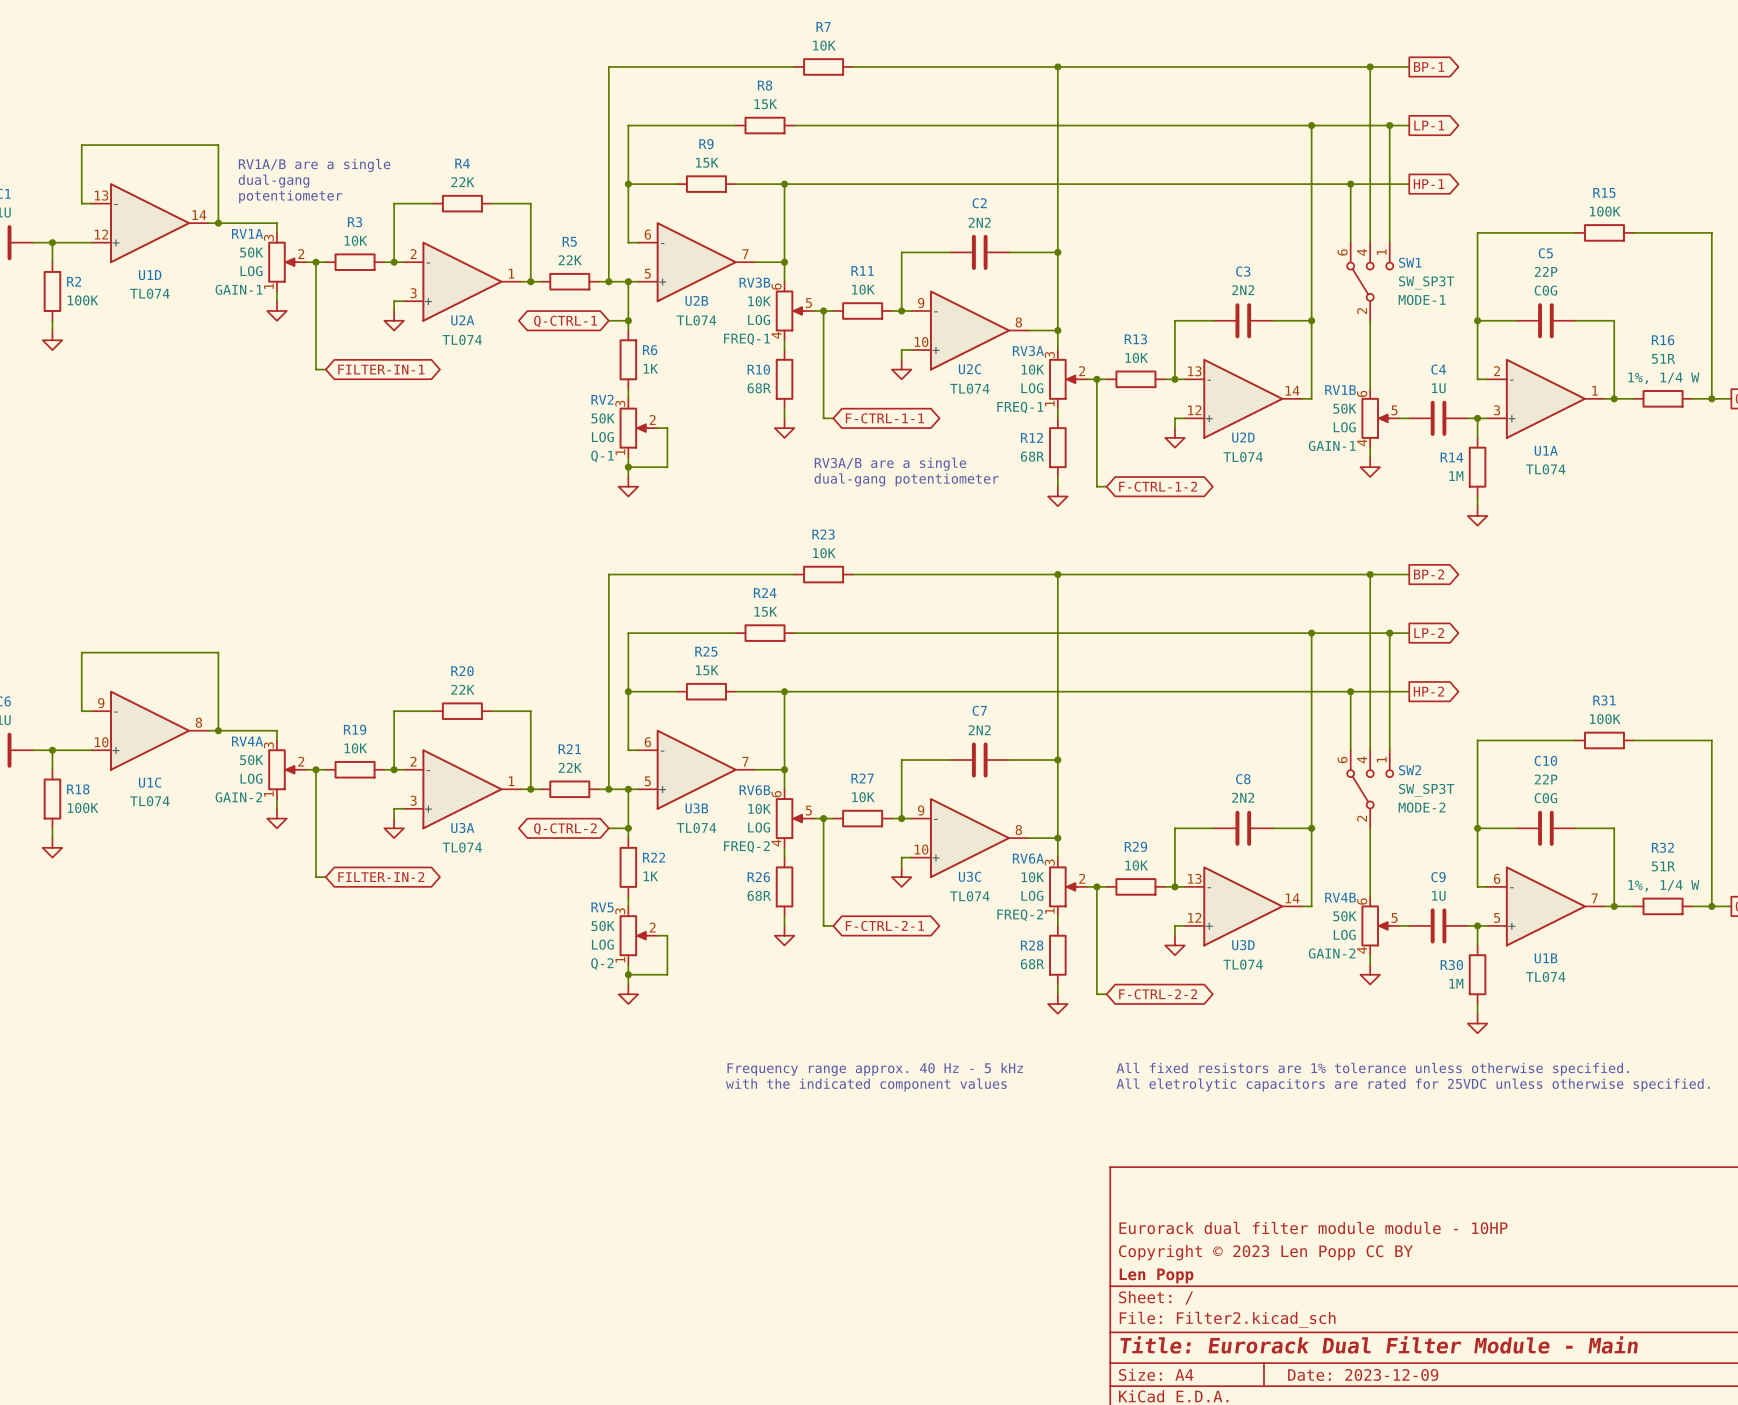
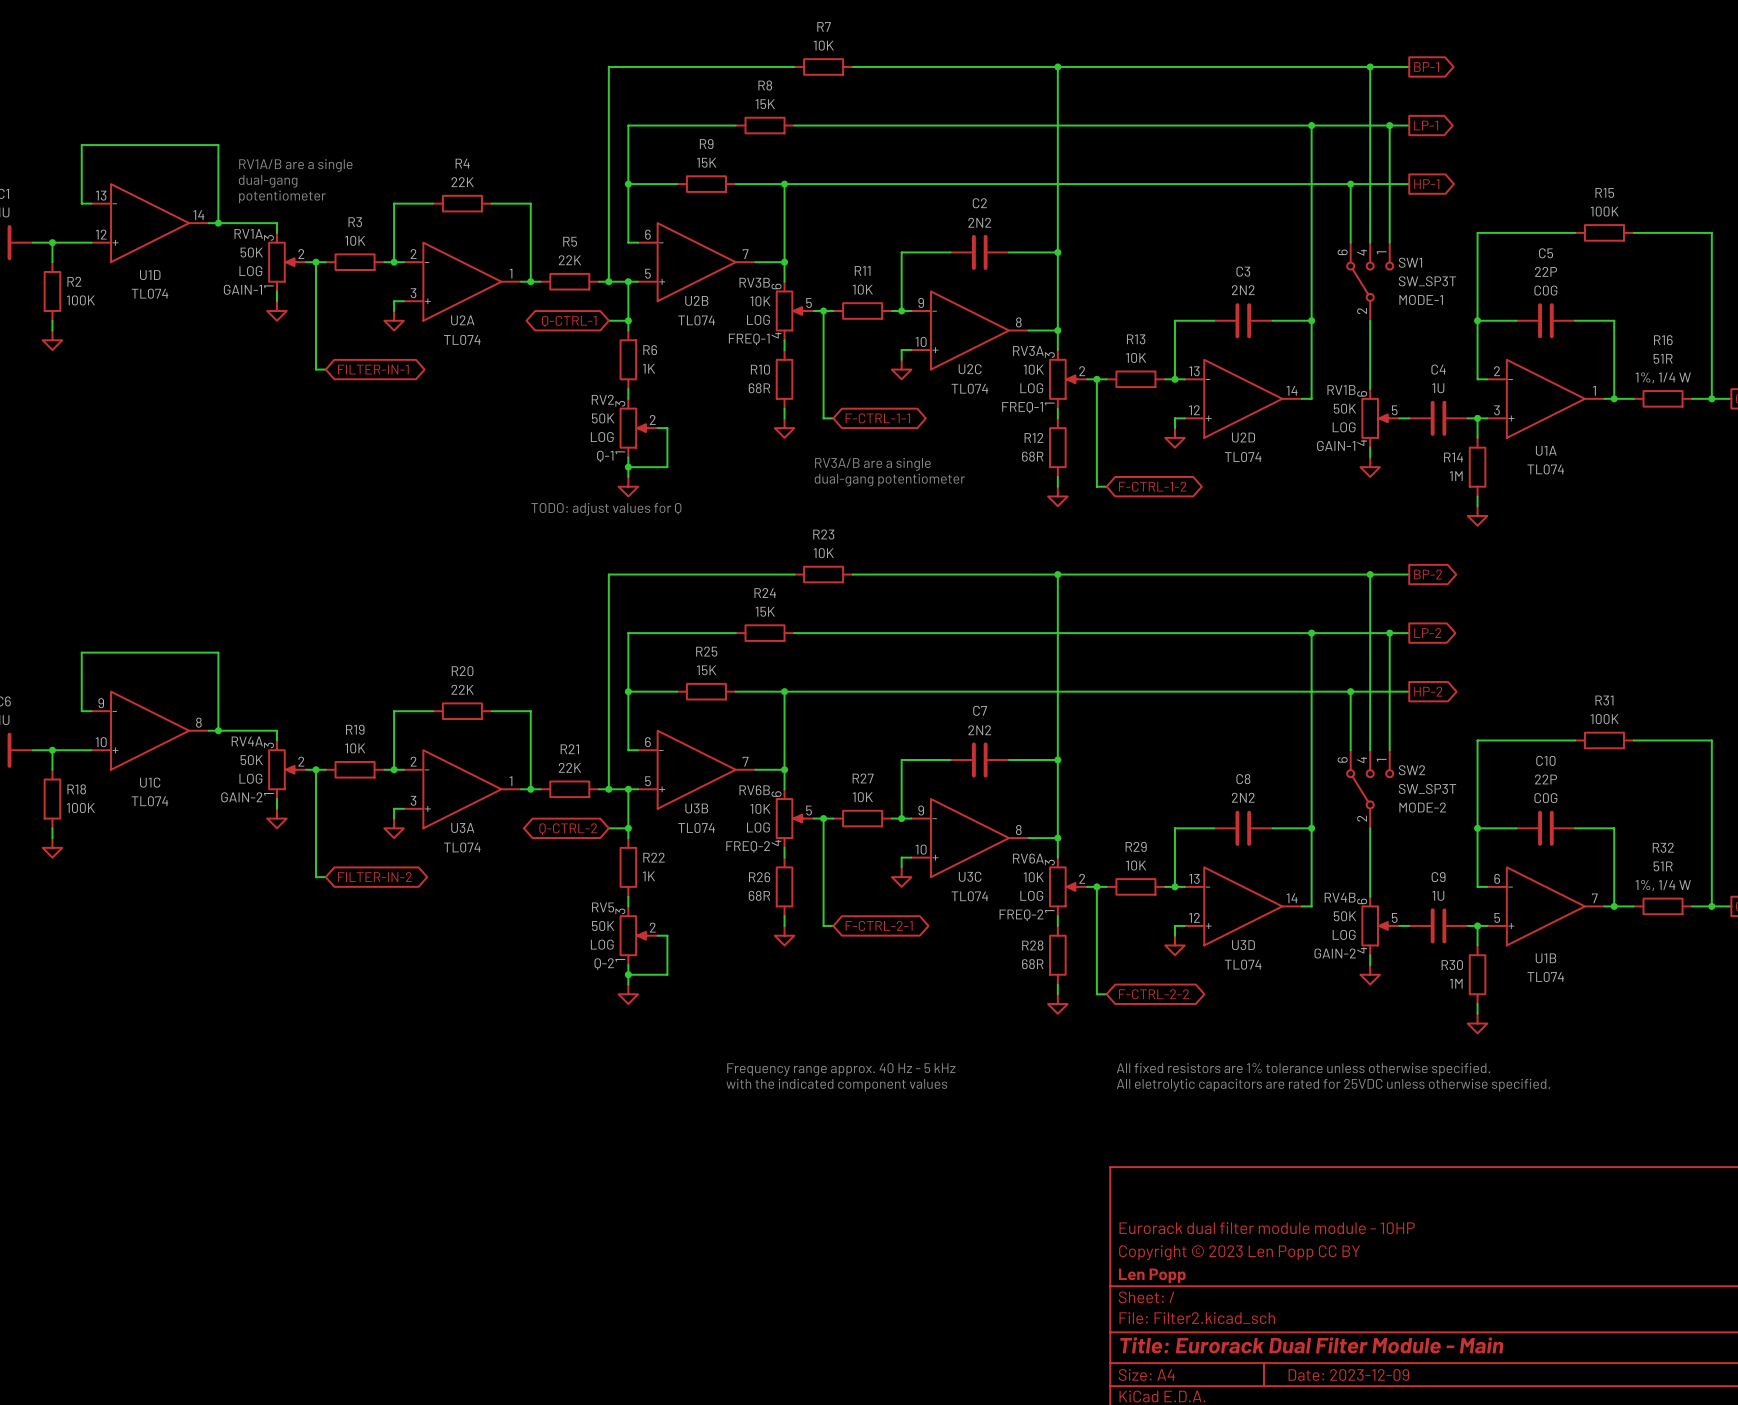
text: none -> TODO: adjust values for Q (606, 509)

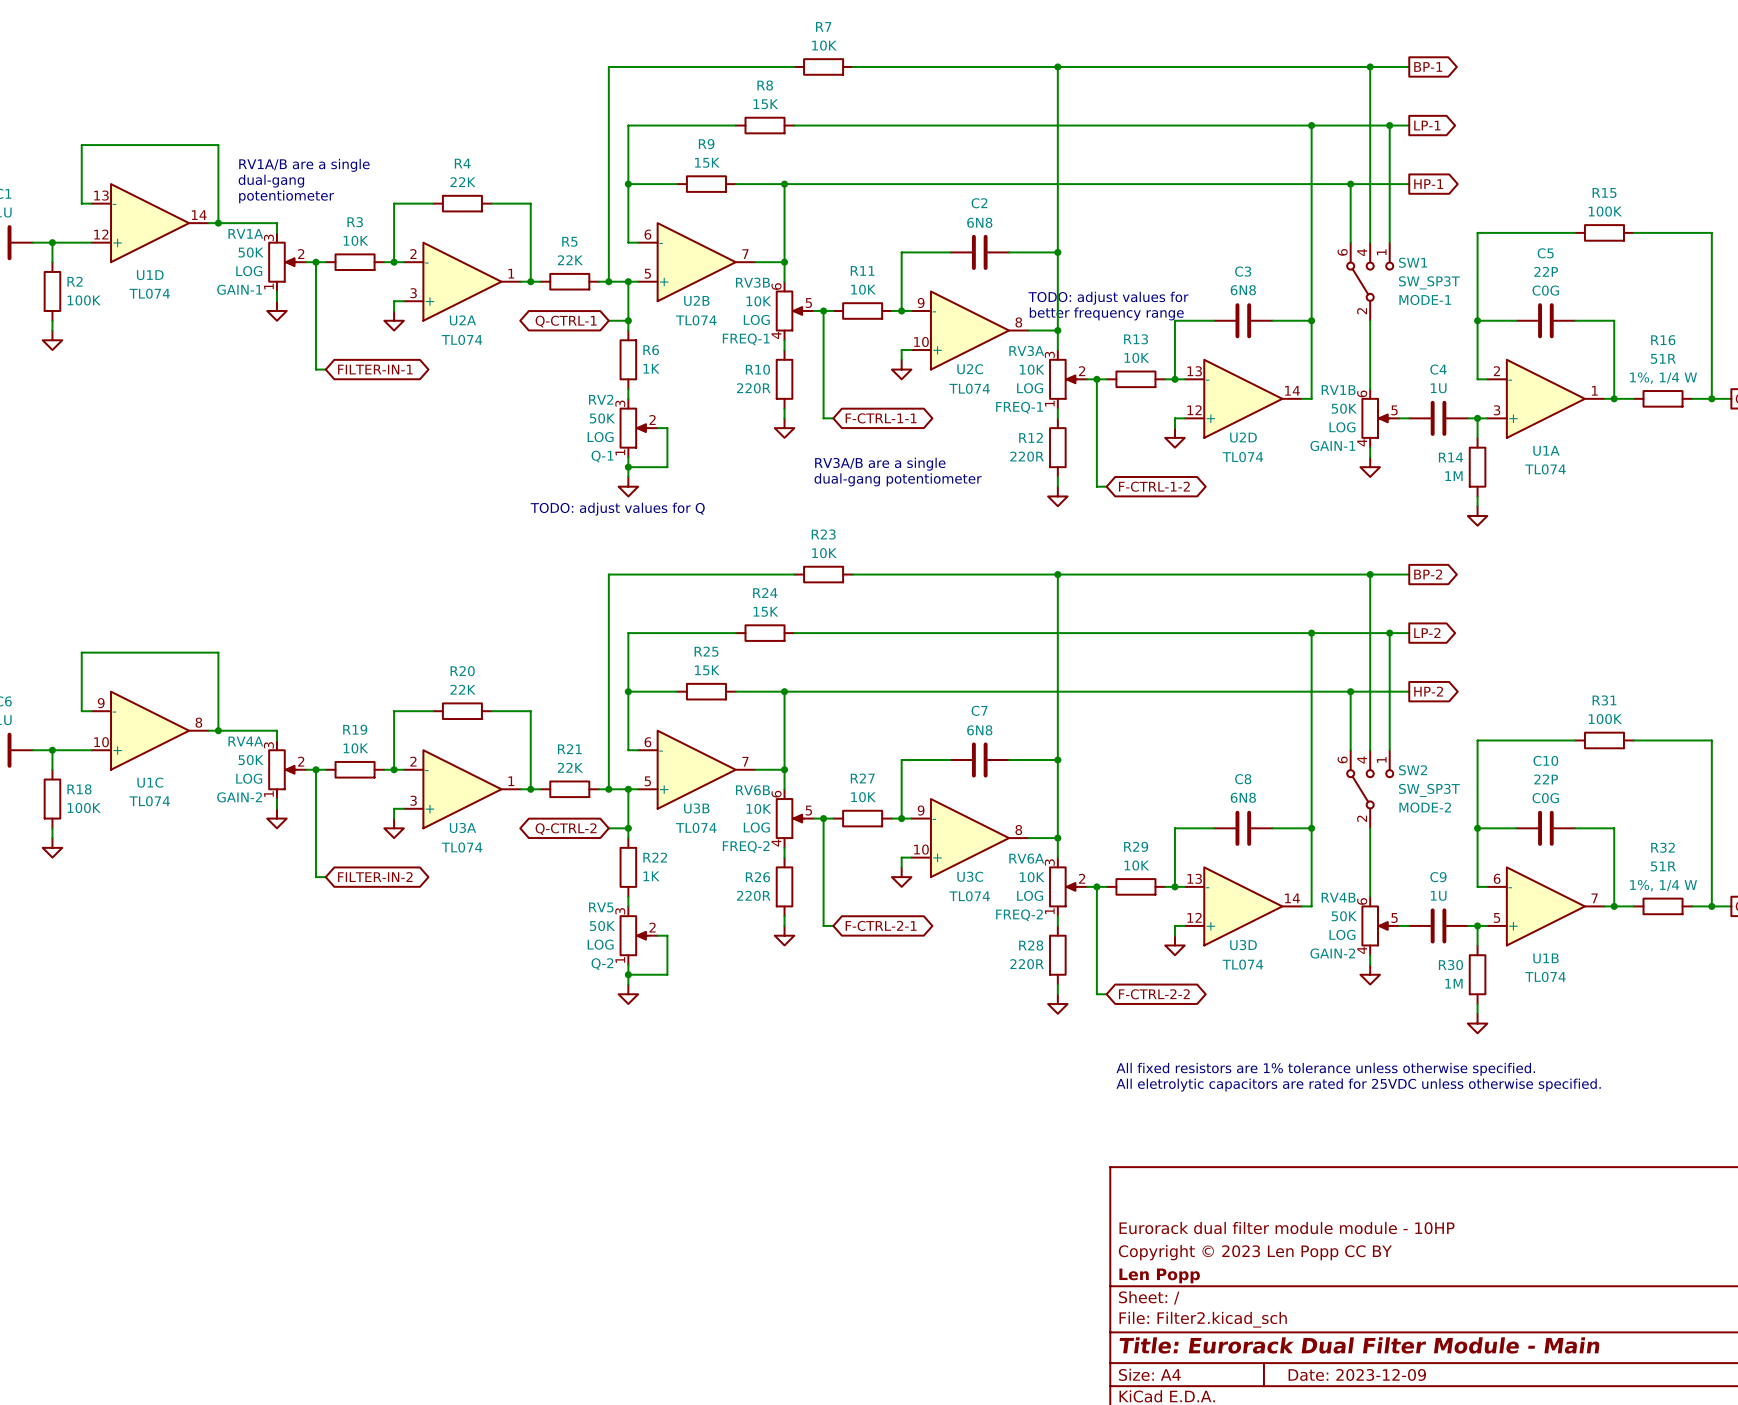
C2 value: 2N2 (979, 222) -> 6N8 (979, 222)
C3 value: 2N2 (1243, 290) -> 6N8 (1243, 290)
text: none -> TODO: adjust values for (1108, 298)
text: none -> better frequency range (1106, 313)
R10 value: 68R (759, 388) -> 220R (753, 388)
R12 value: 68R (1032, 456) -> 220R (1027, 456)
C7 value: 2N2 (979, 730) -> 6N8 (979, 730)
C8 value: 2N2 (1243, 797) -> 6N8 (1243, 797)
R26 value: 68R (759, 895) -> 220R (753, 895)
R28 value: 68R (1032, 964) -> 220R (1027, 964)
text: Frequency range approx. 40 Hz - 5 kHz (841, 1069) -> none
text: with the indicated component values (836, 1085) -> none

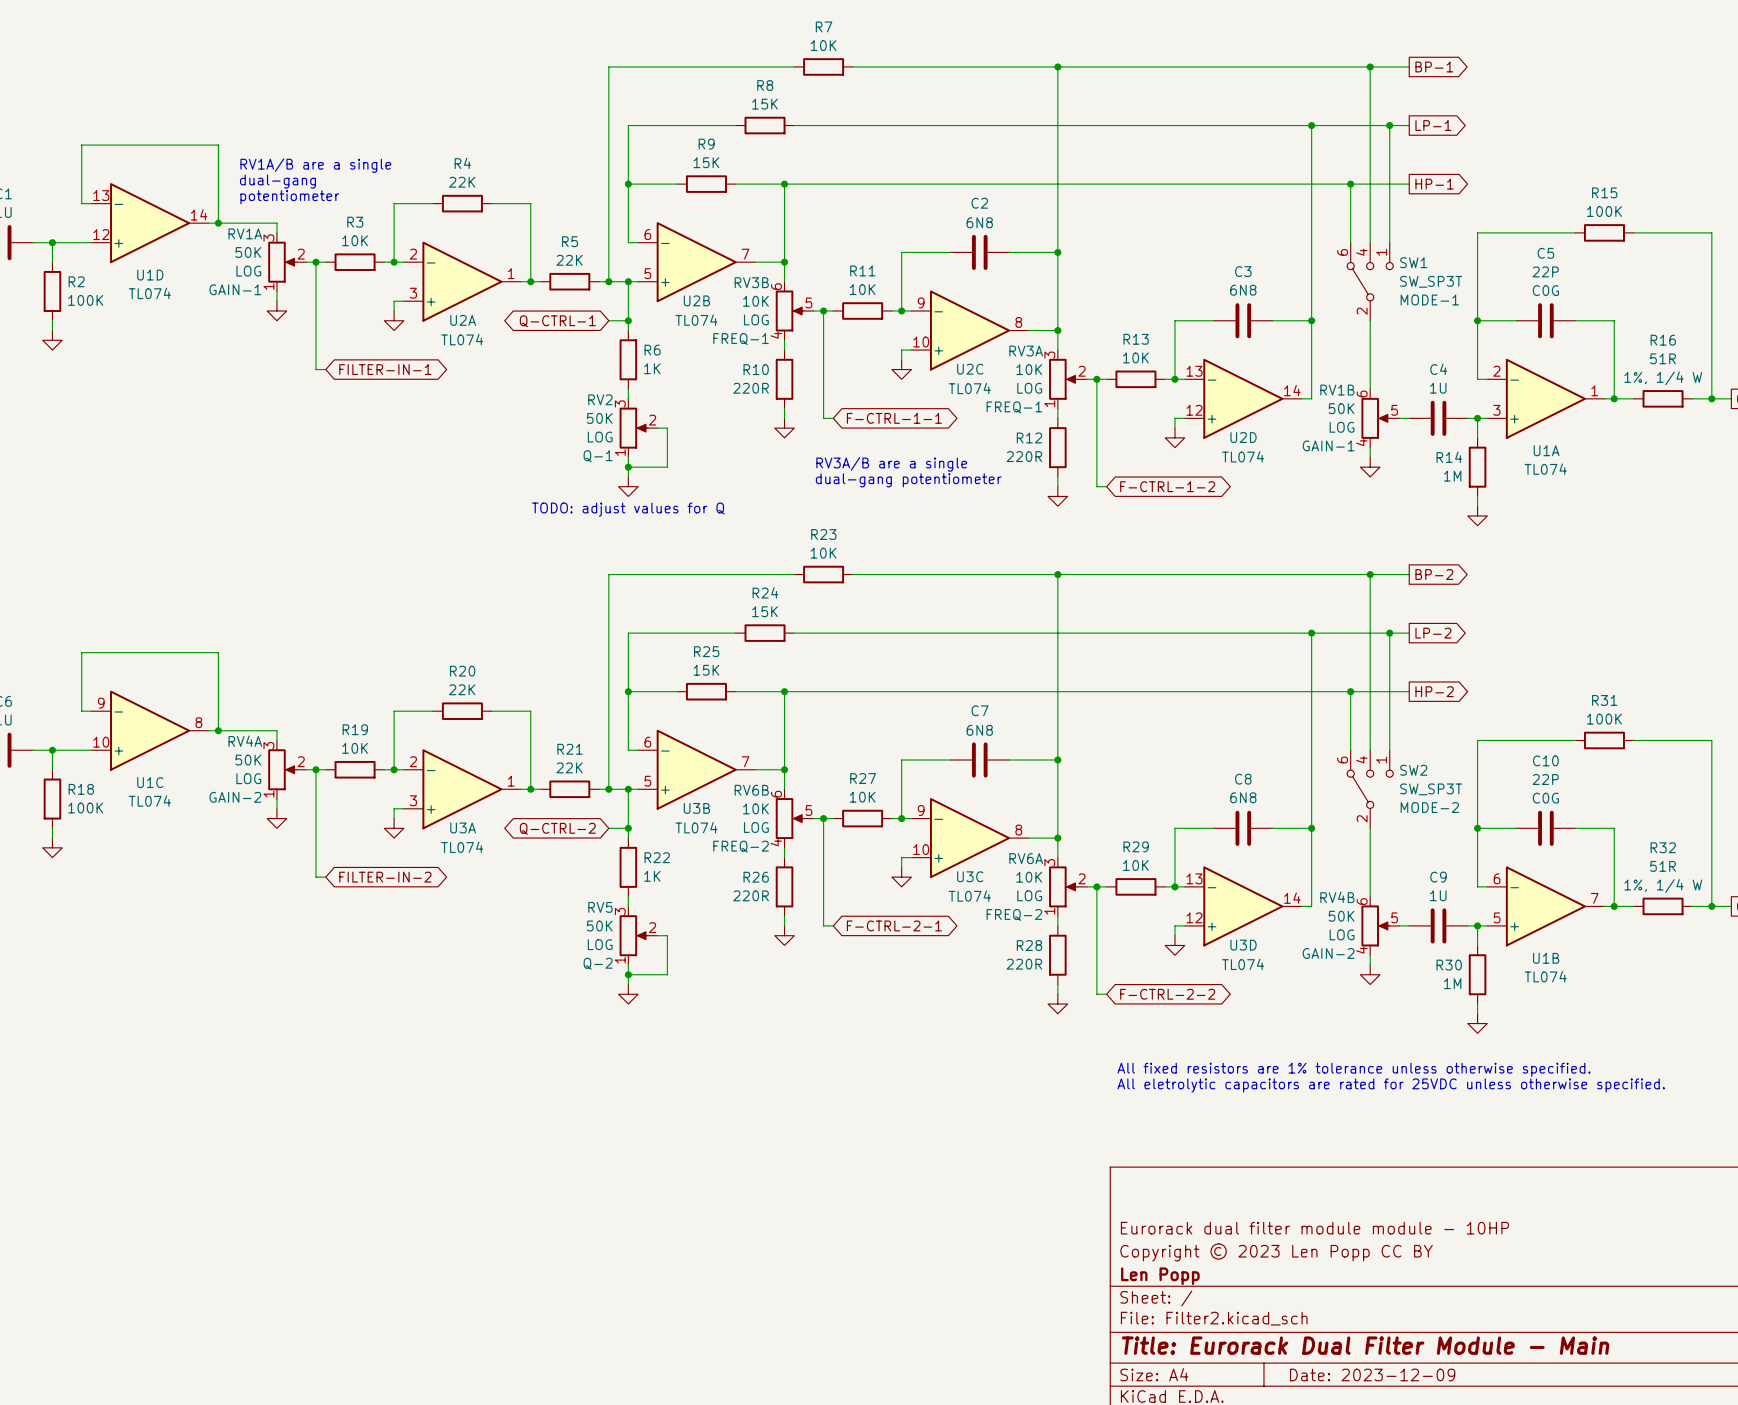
text: TODO: adjust values for (1108, 298) -> none
text: better frequency range (1106, 313) -> none

